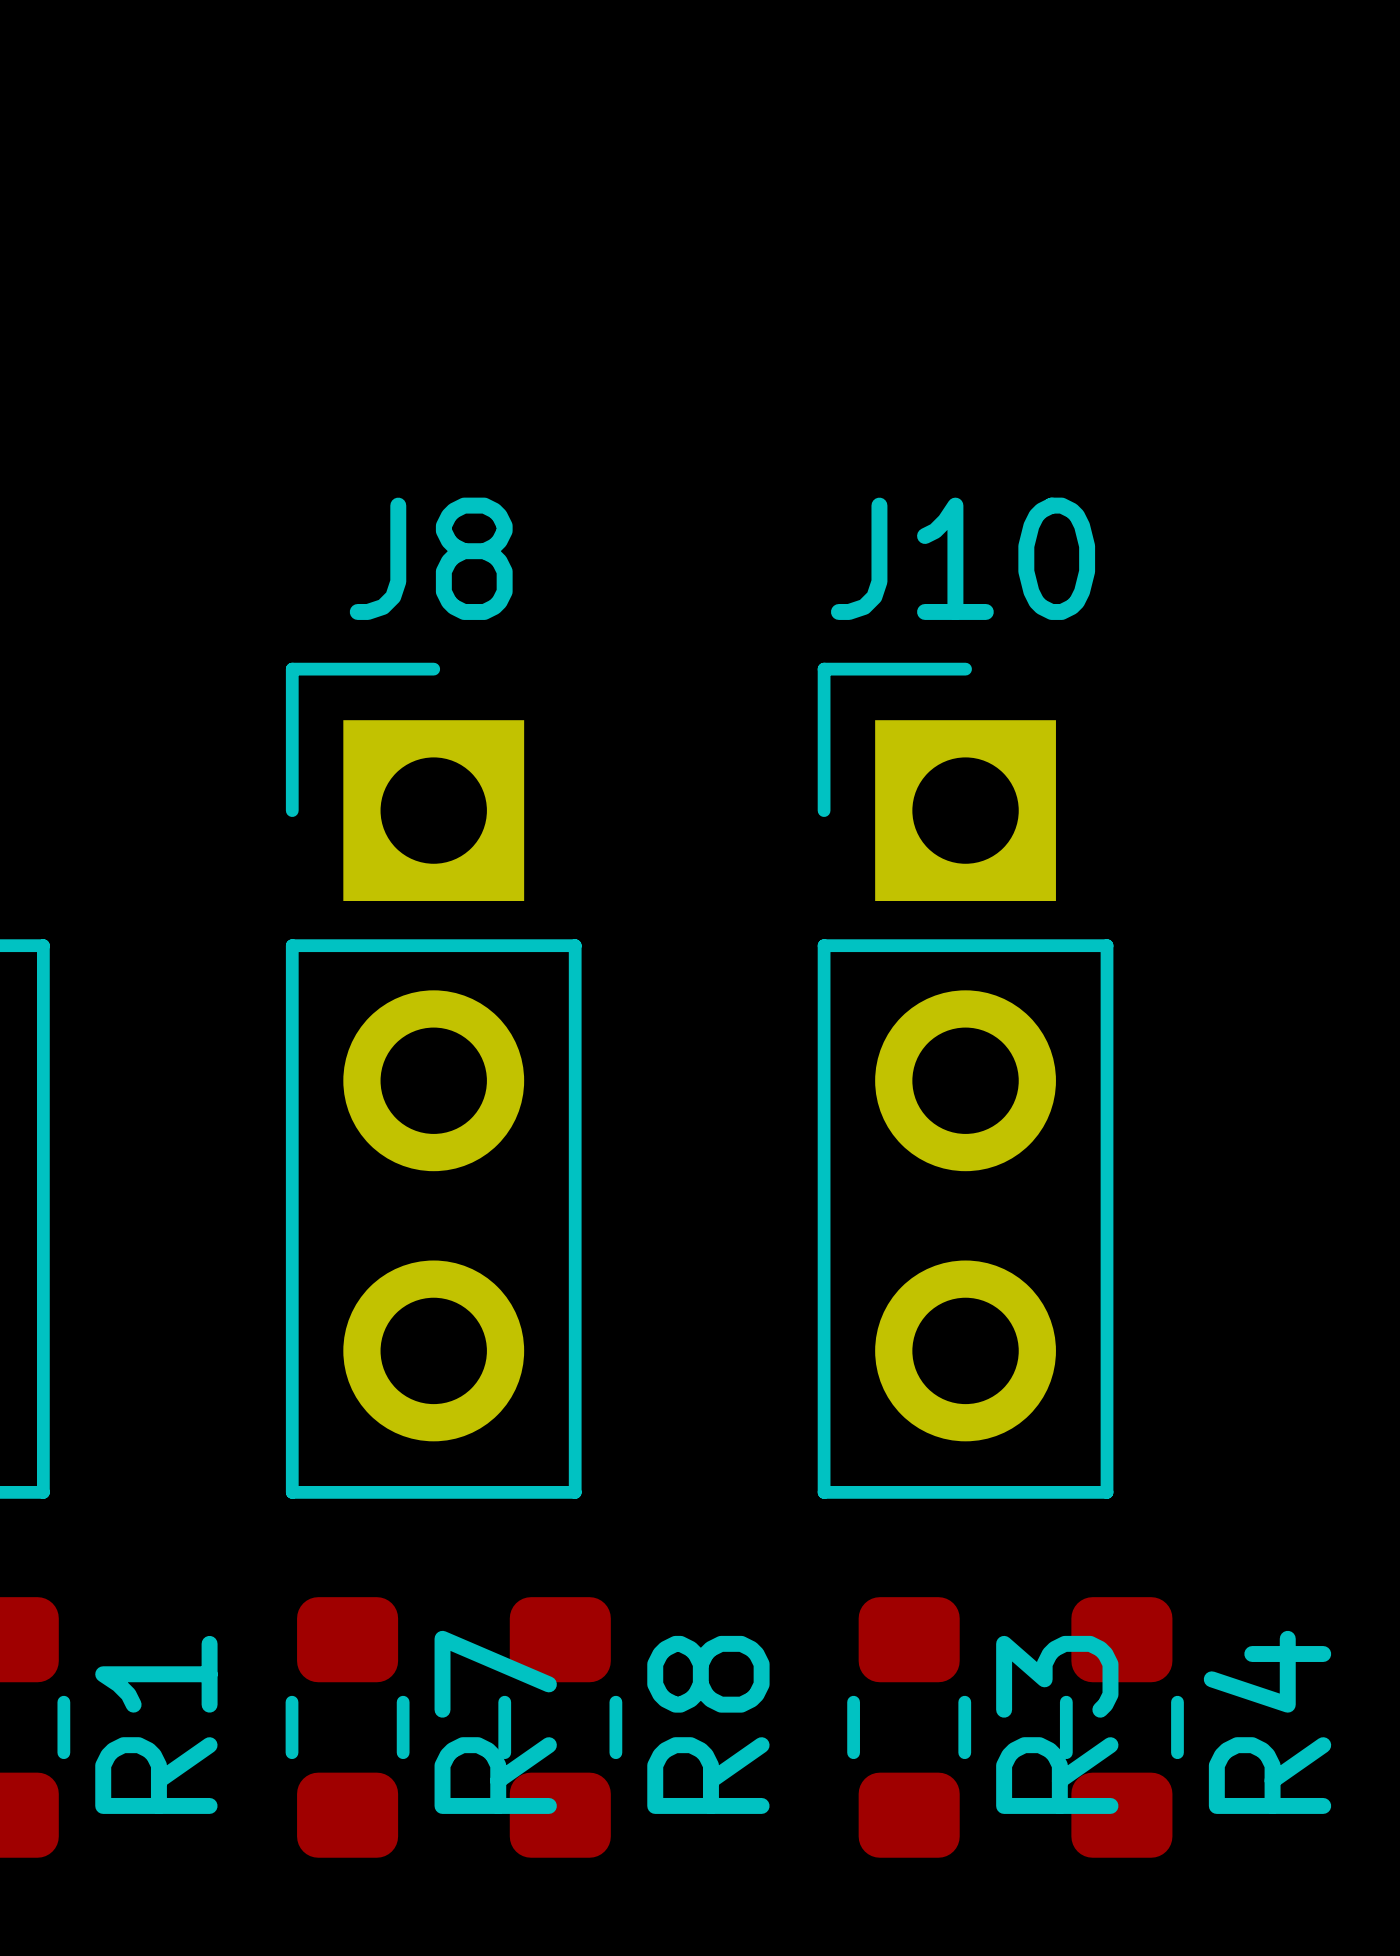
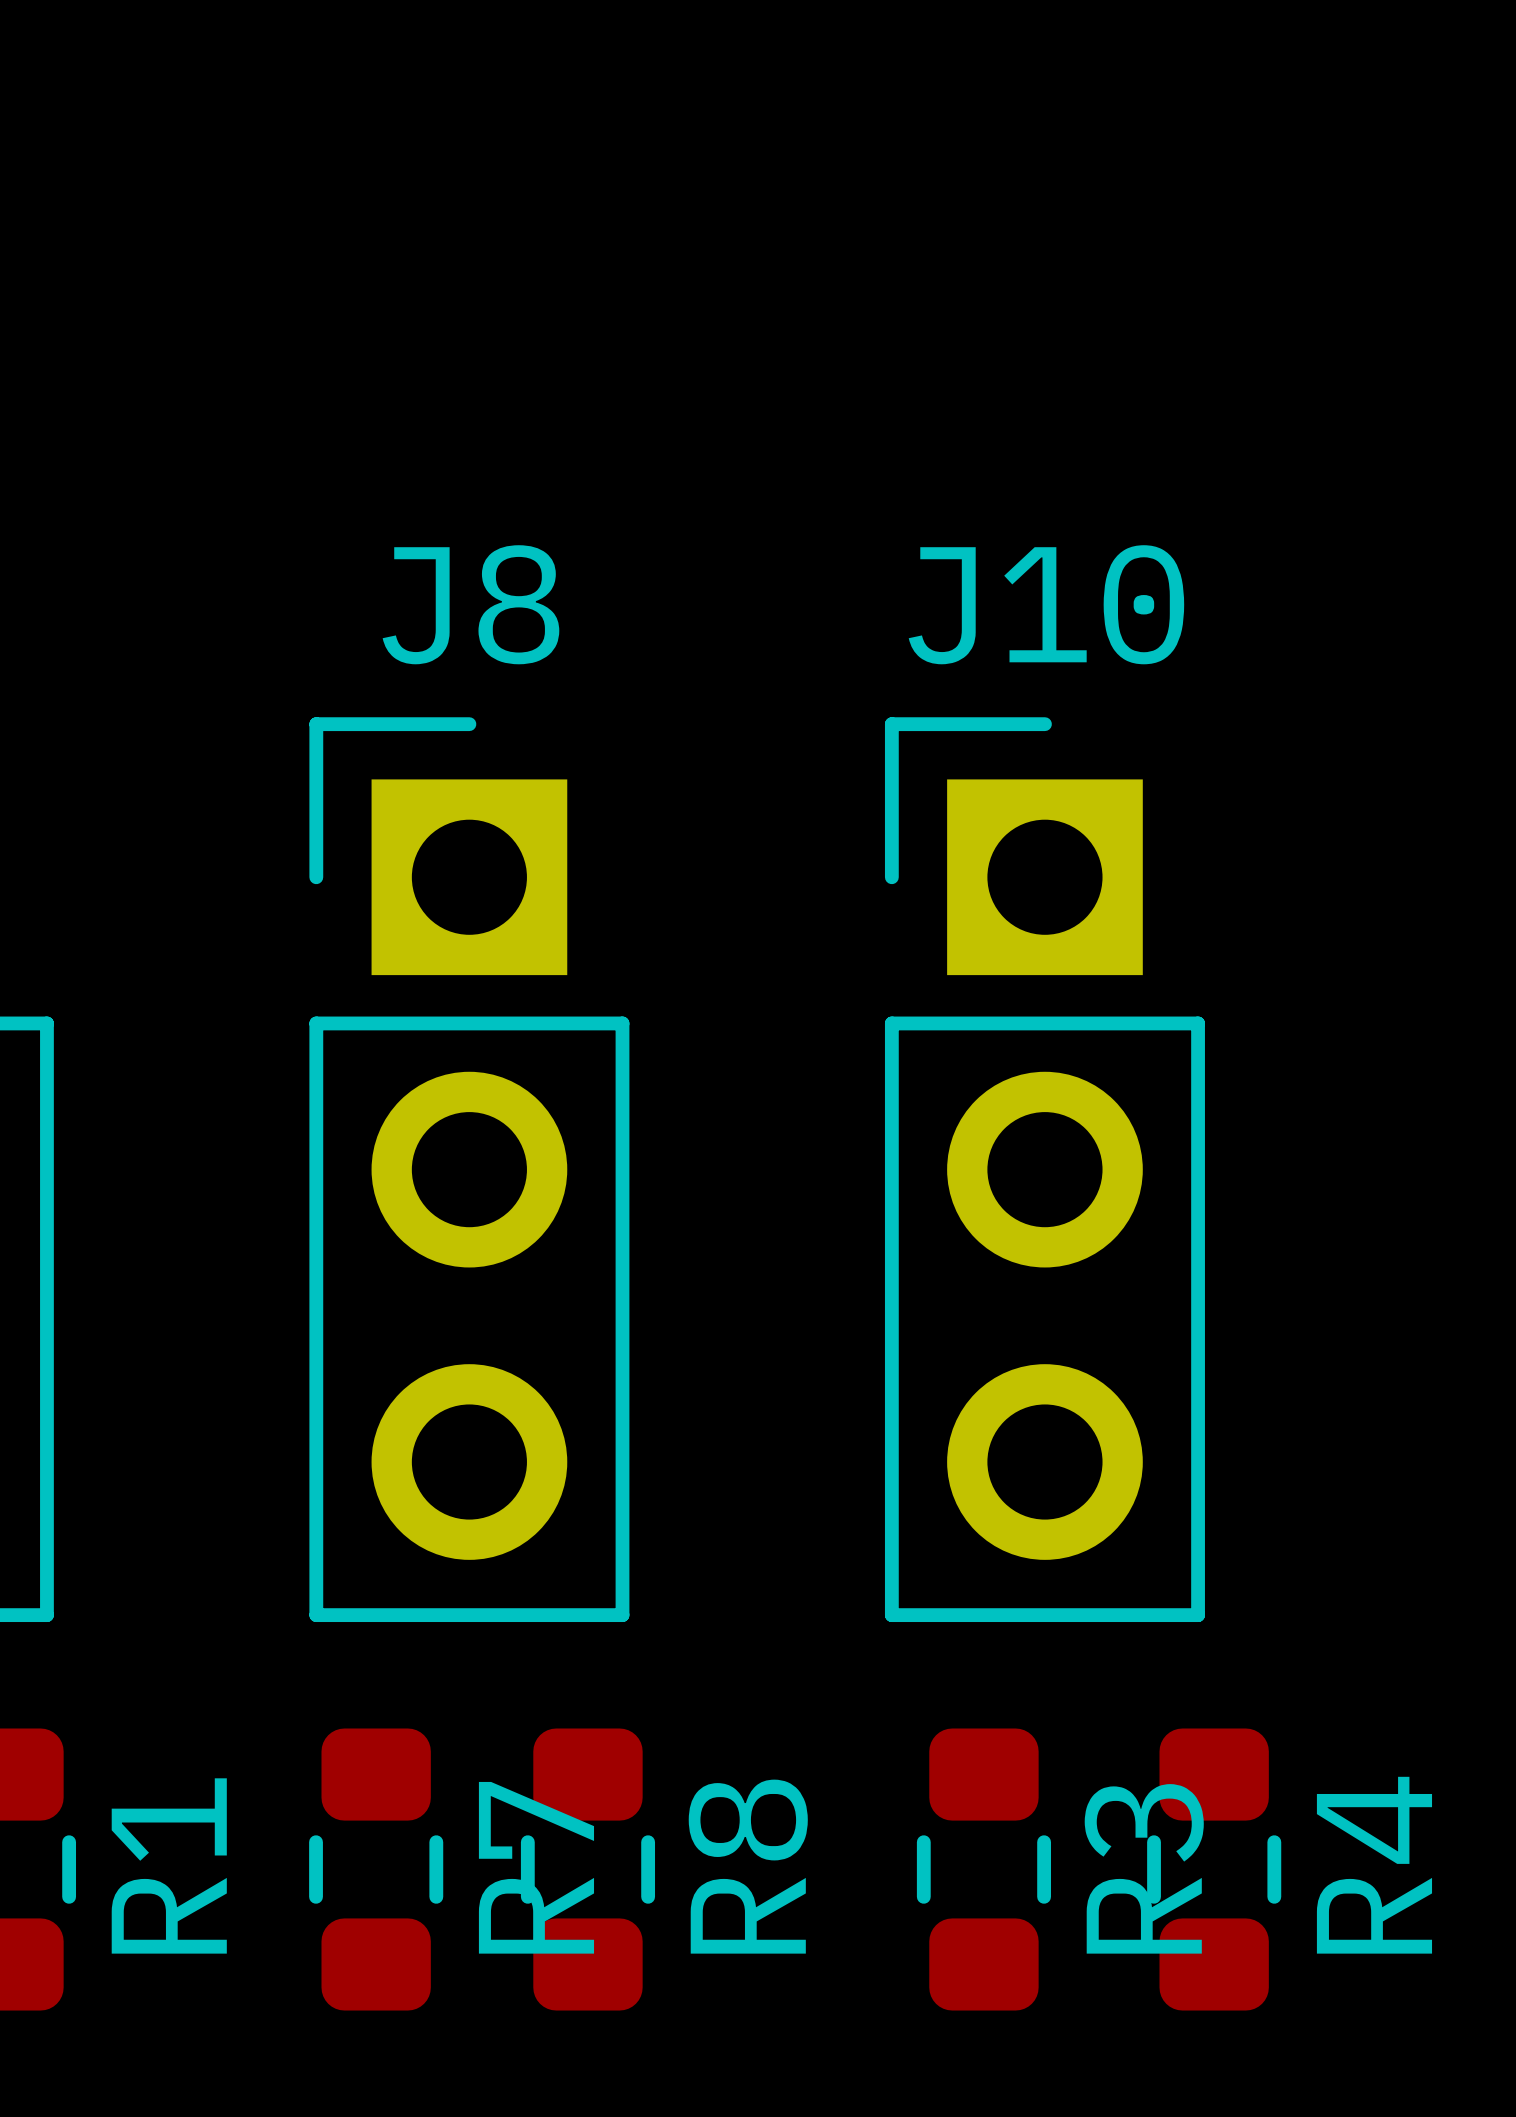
R8 position: (560, 1727) -> (587, 1869)

